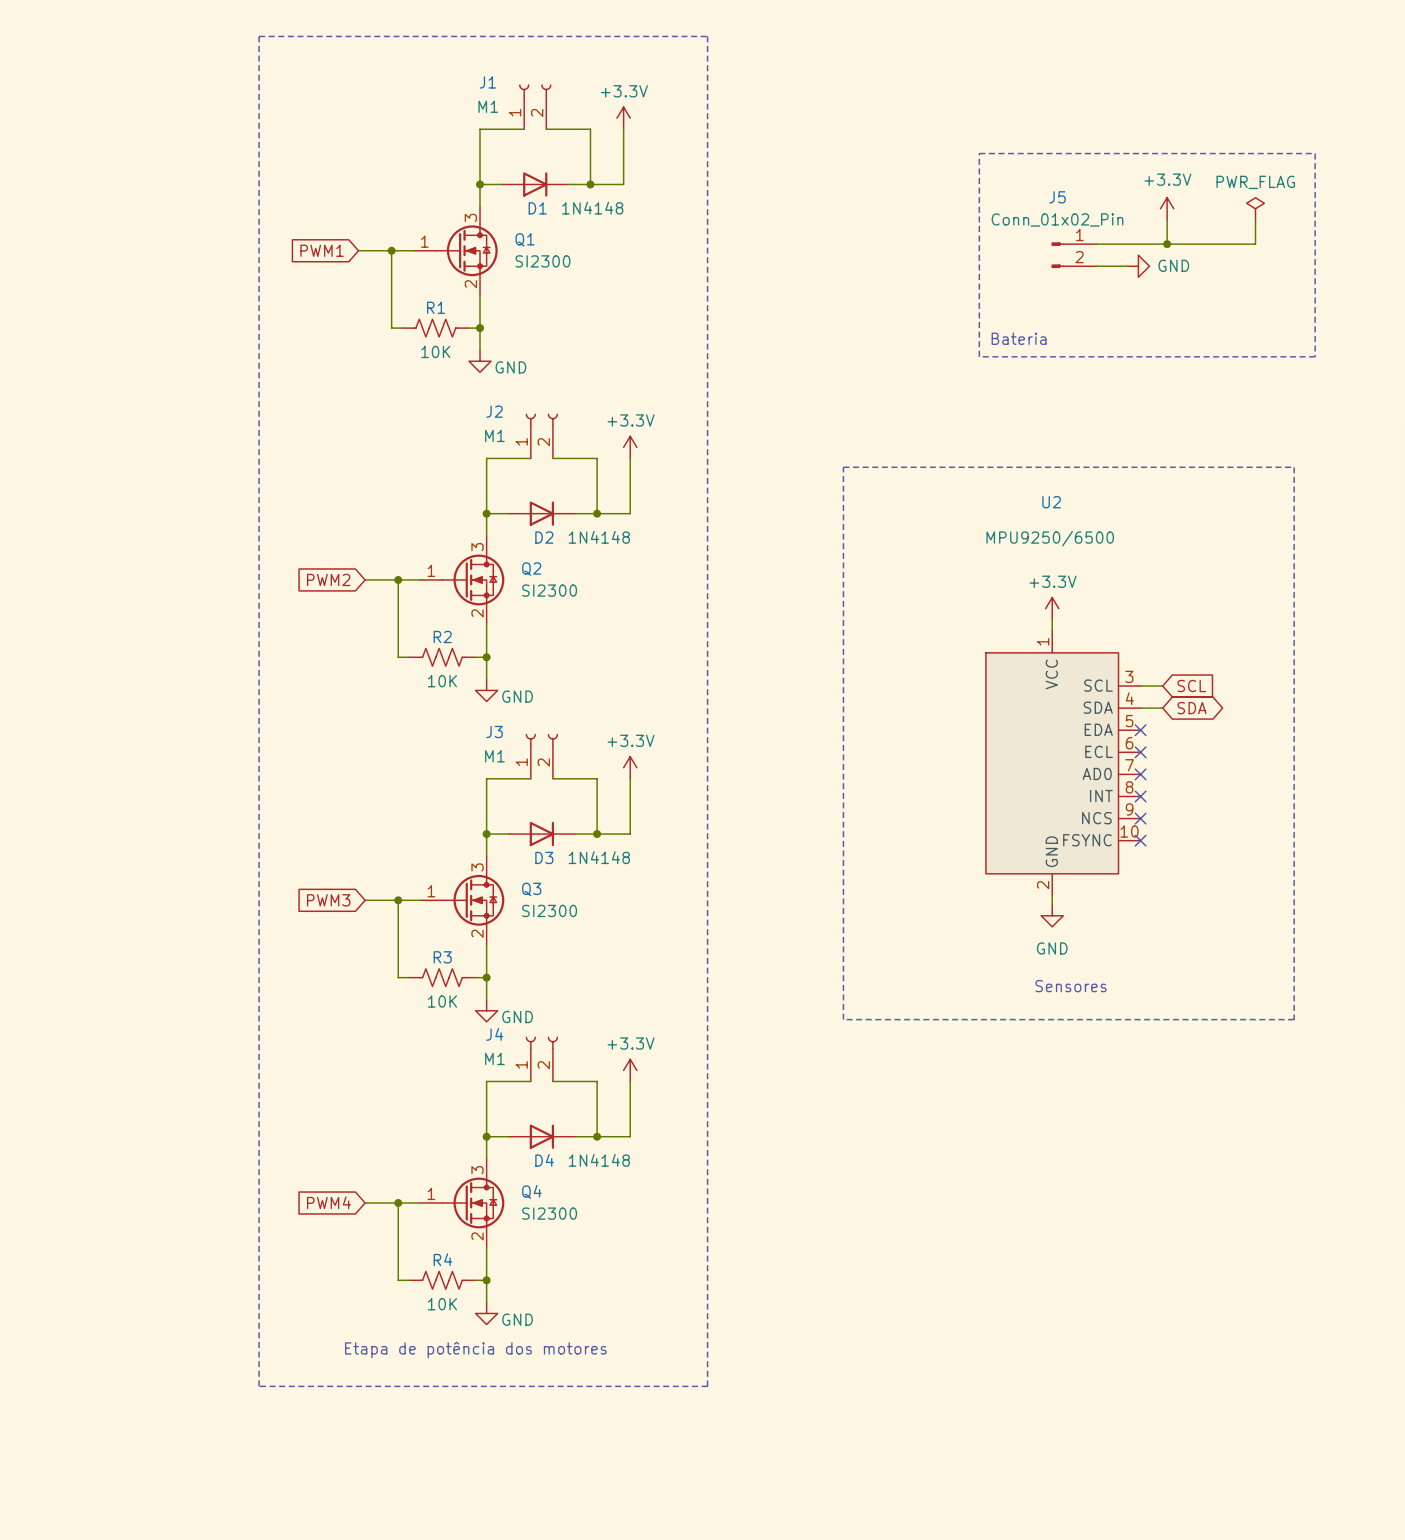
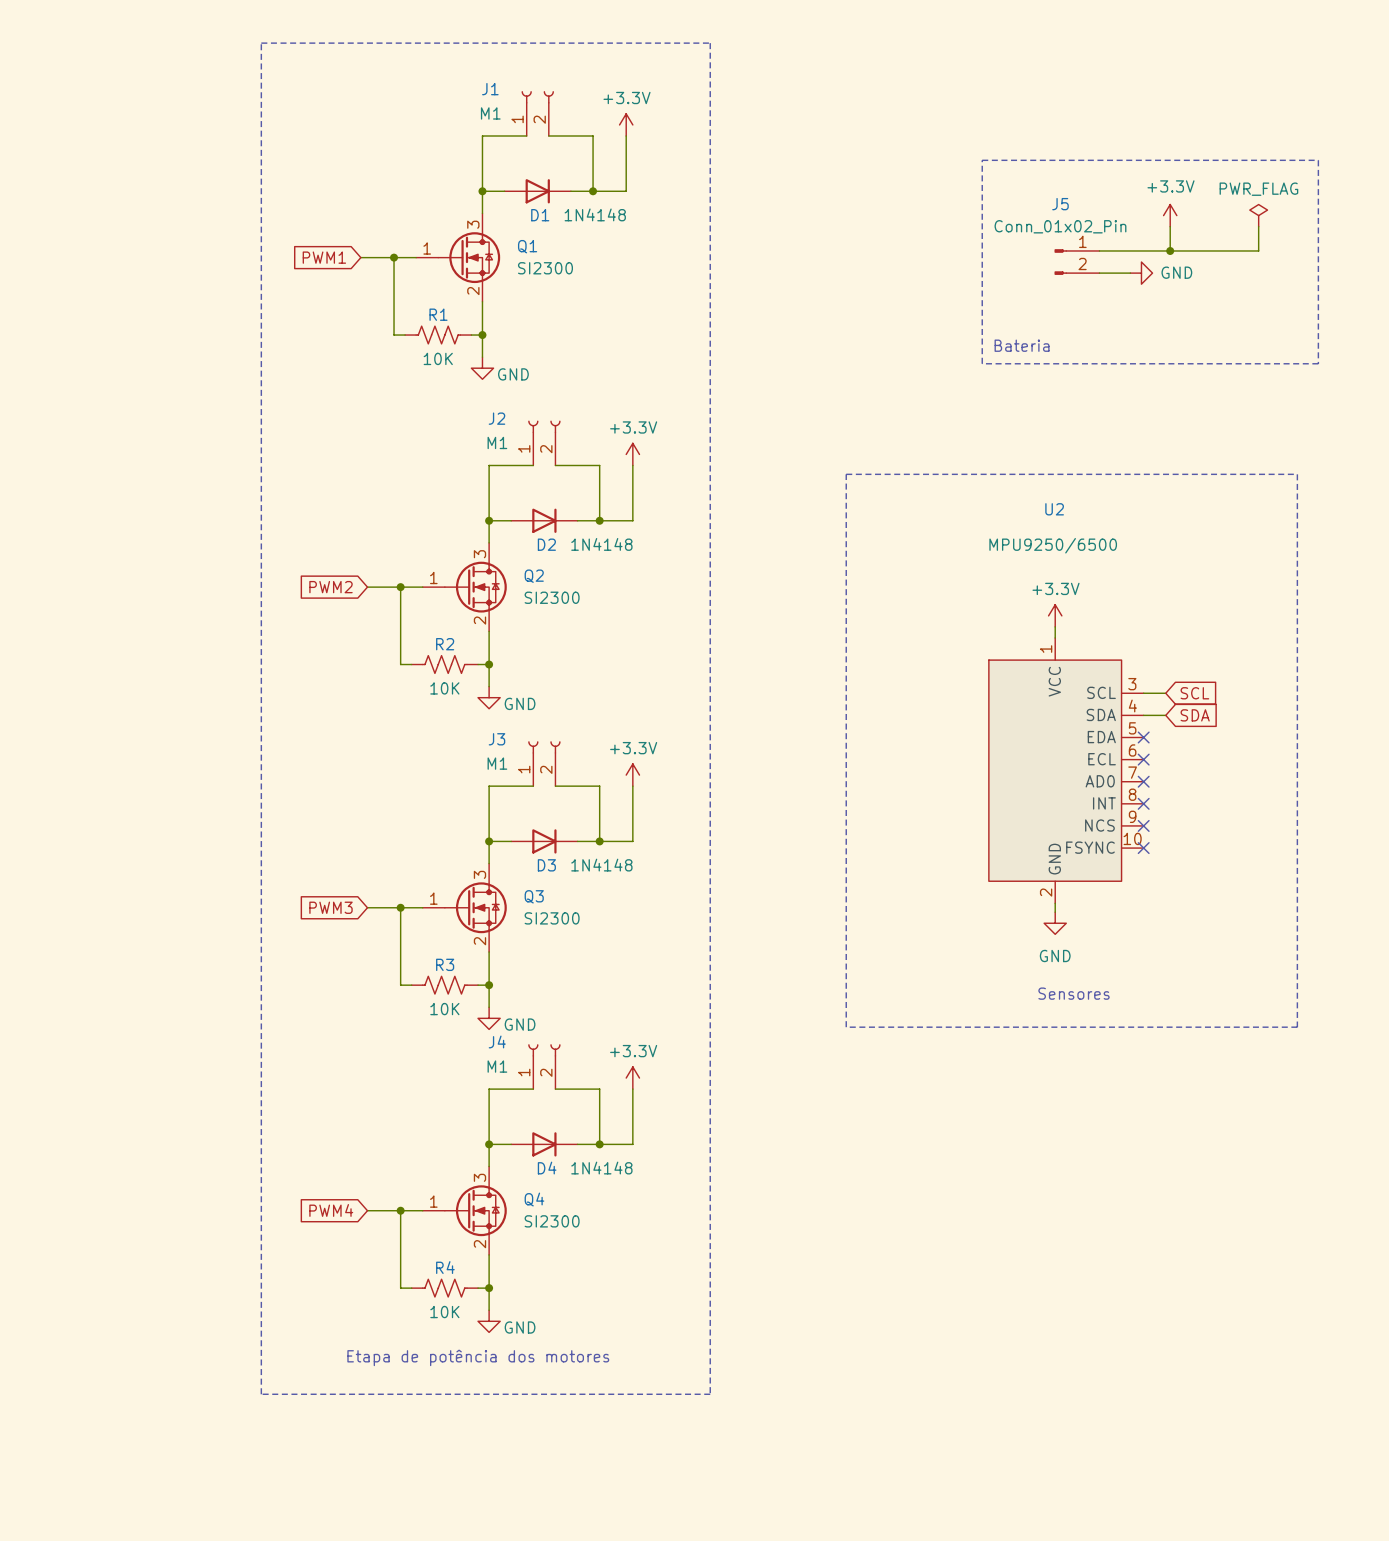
global label shape: bidirectional (1192, 708) -> input (1195, 715)

